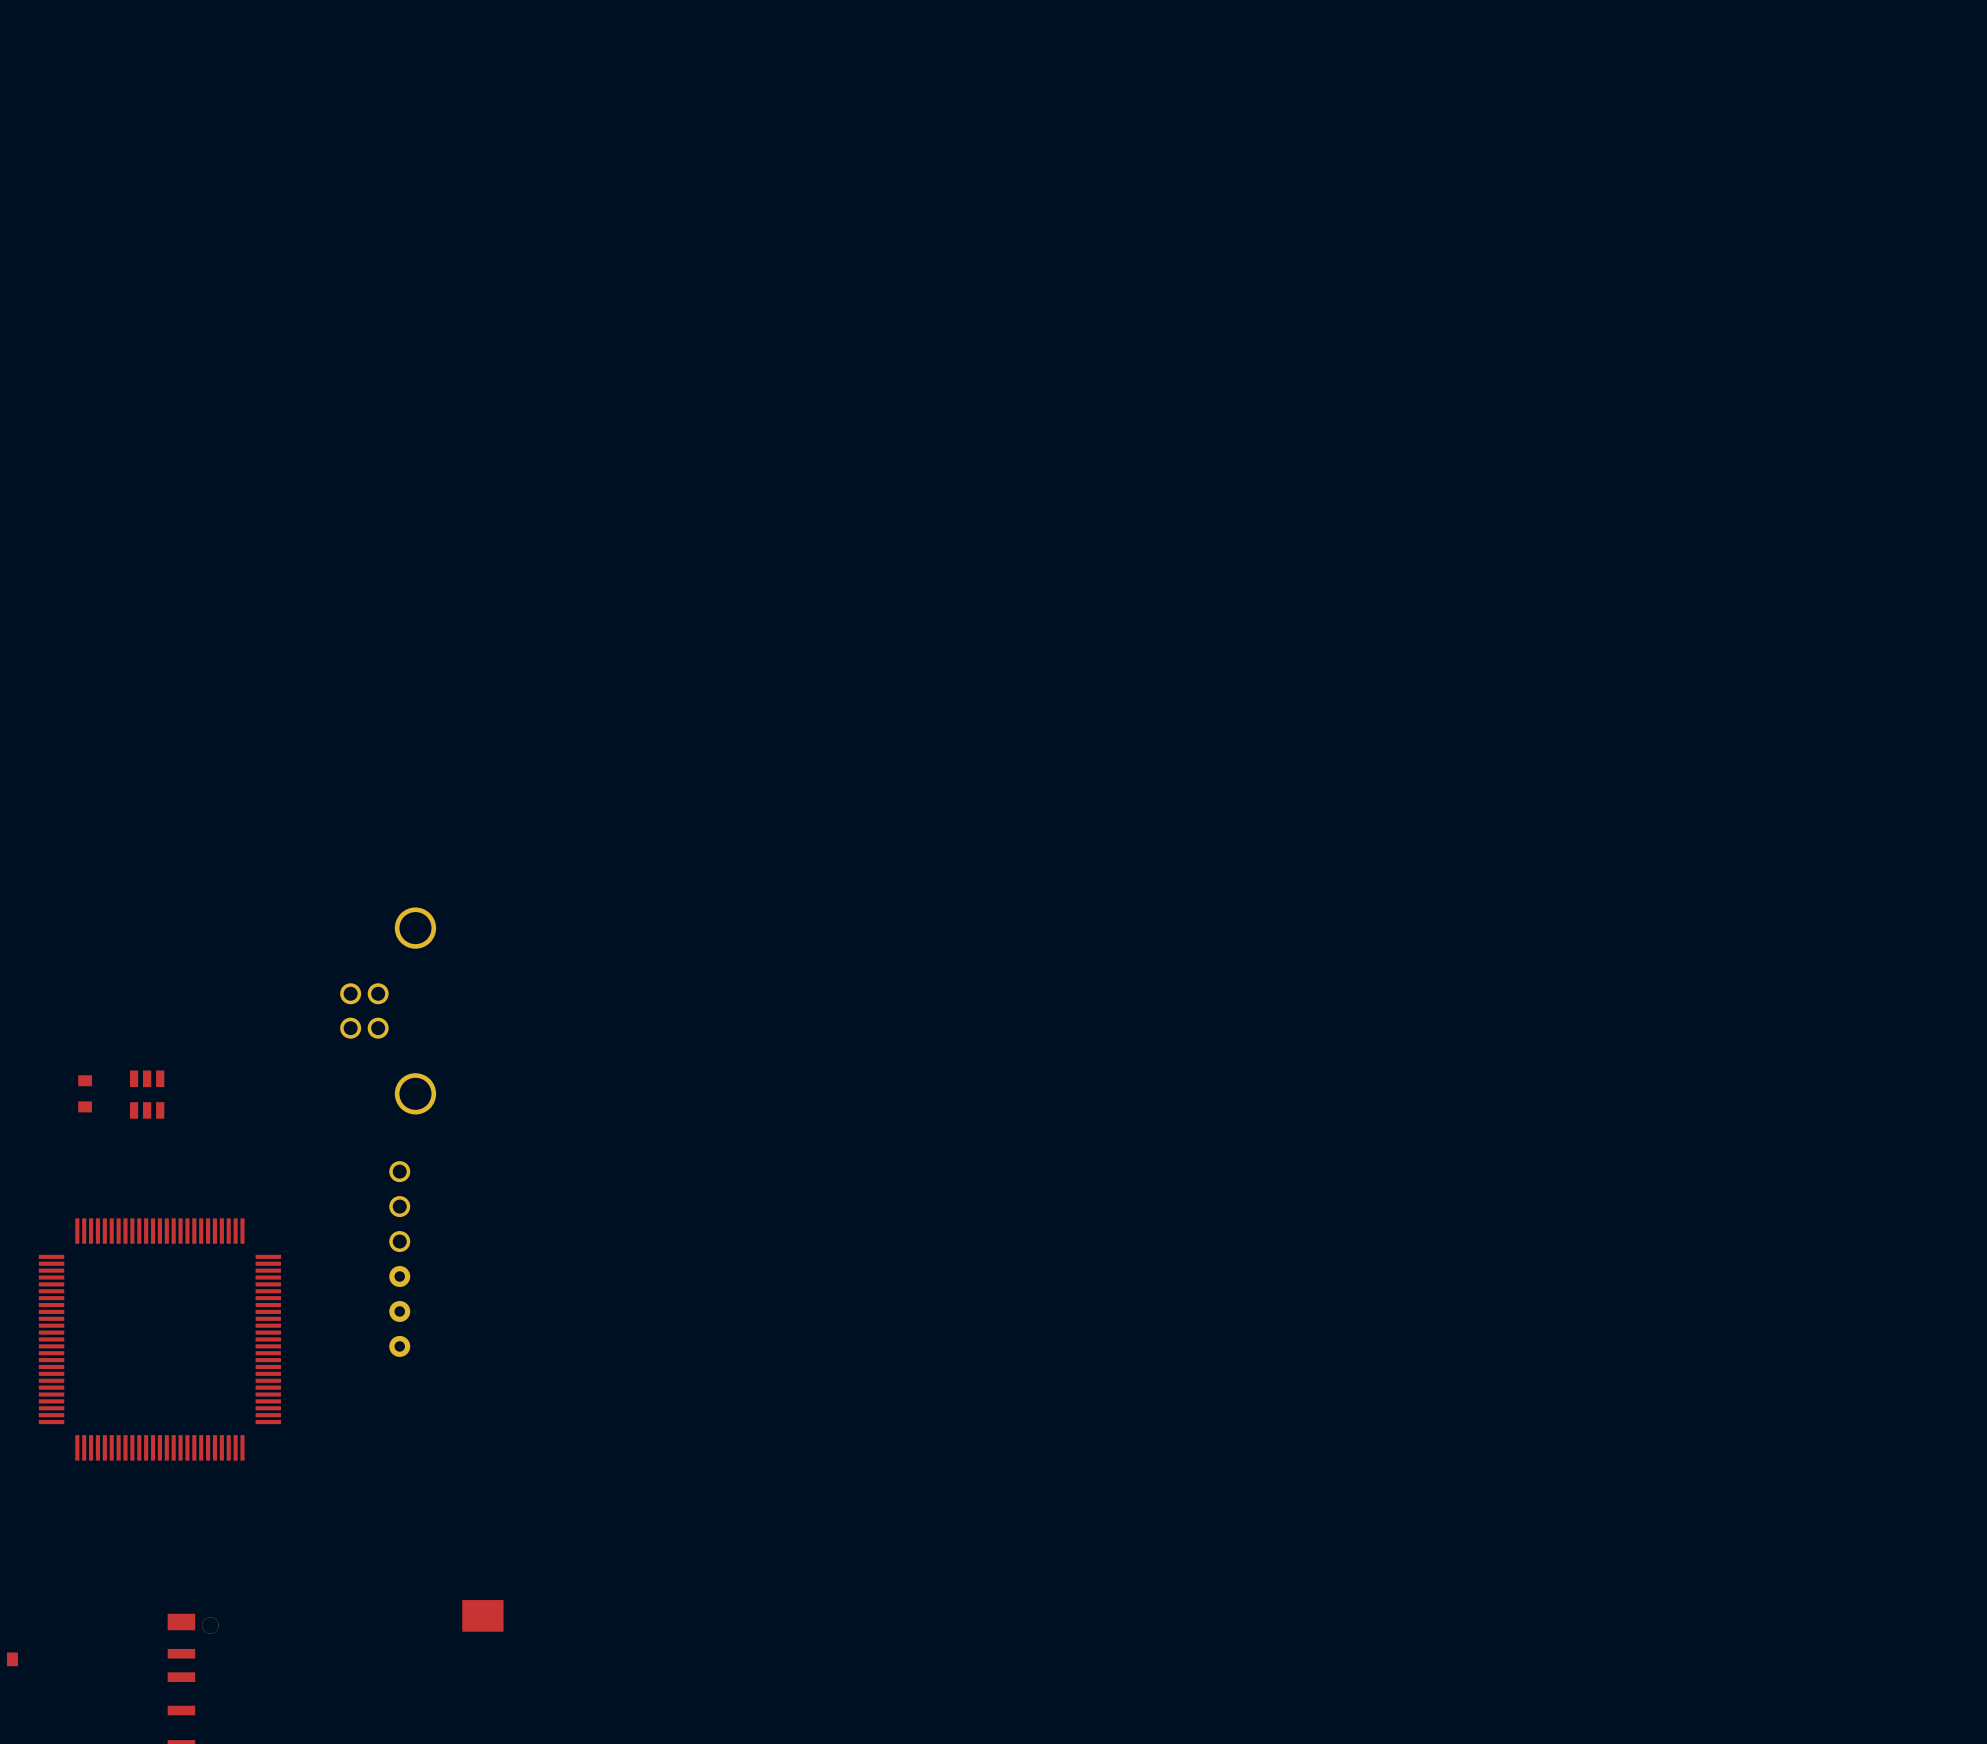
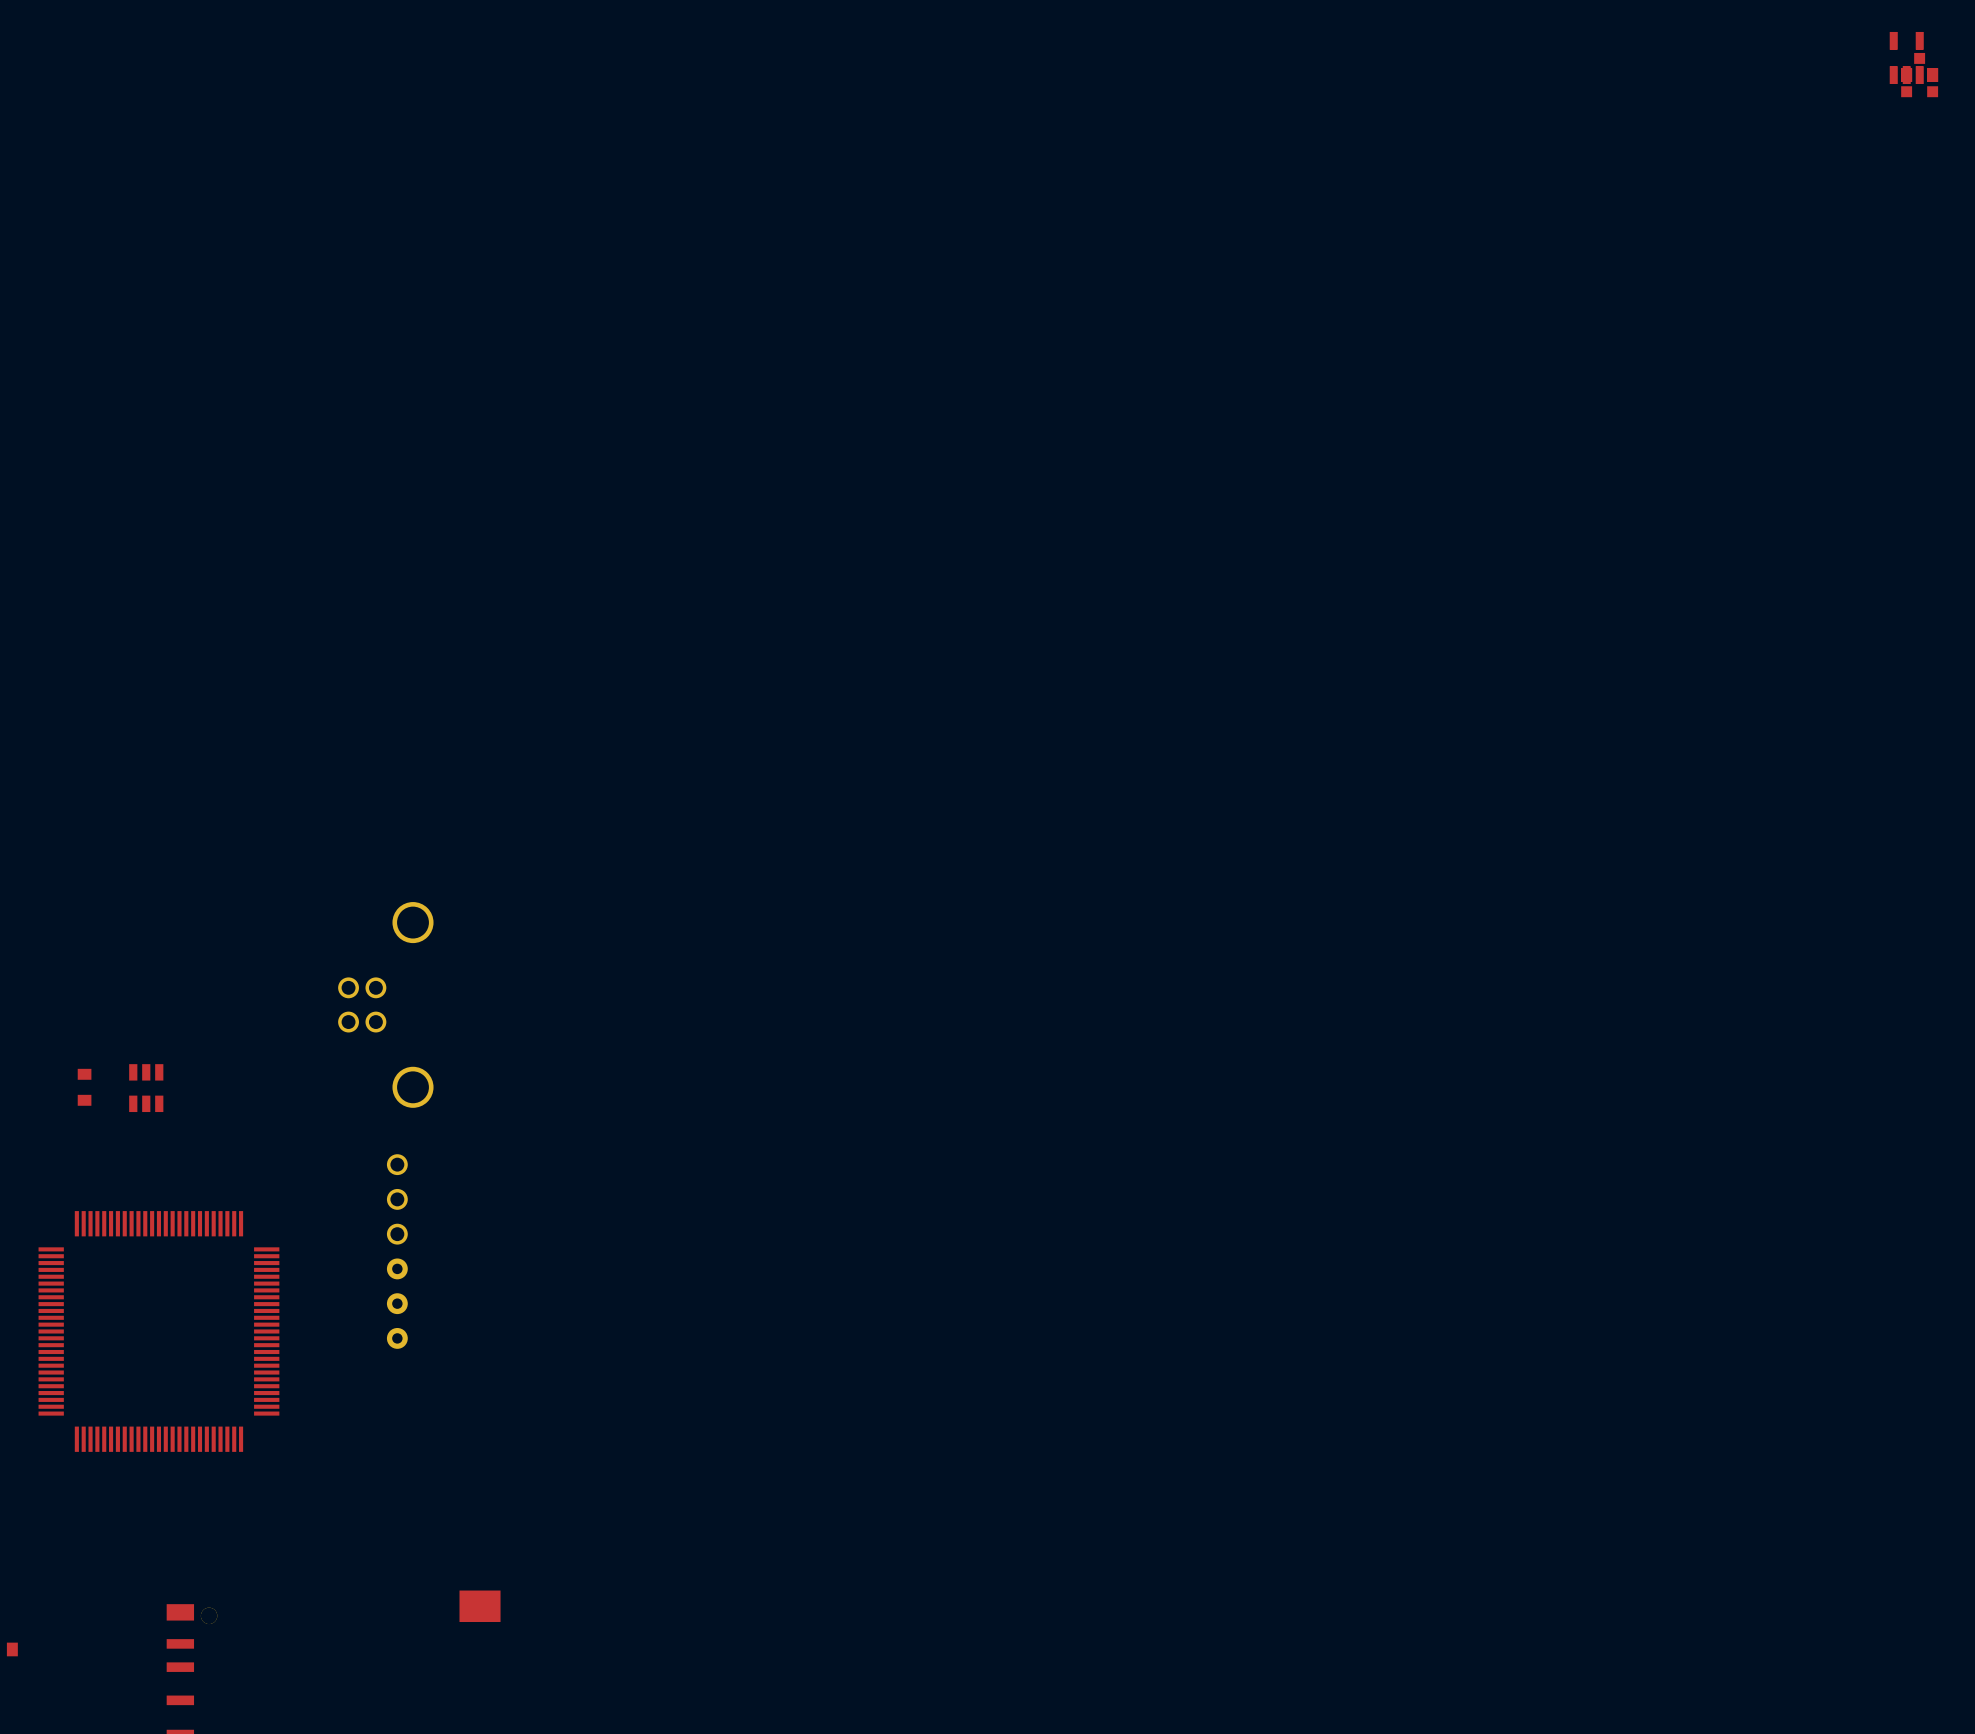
part: none -> (1906, 57)
part: none -> (1919, 75)
part: none -> (1919, 75)

